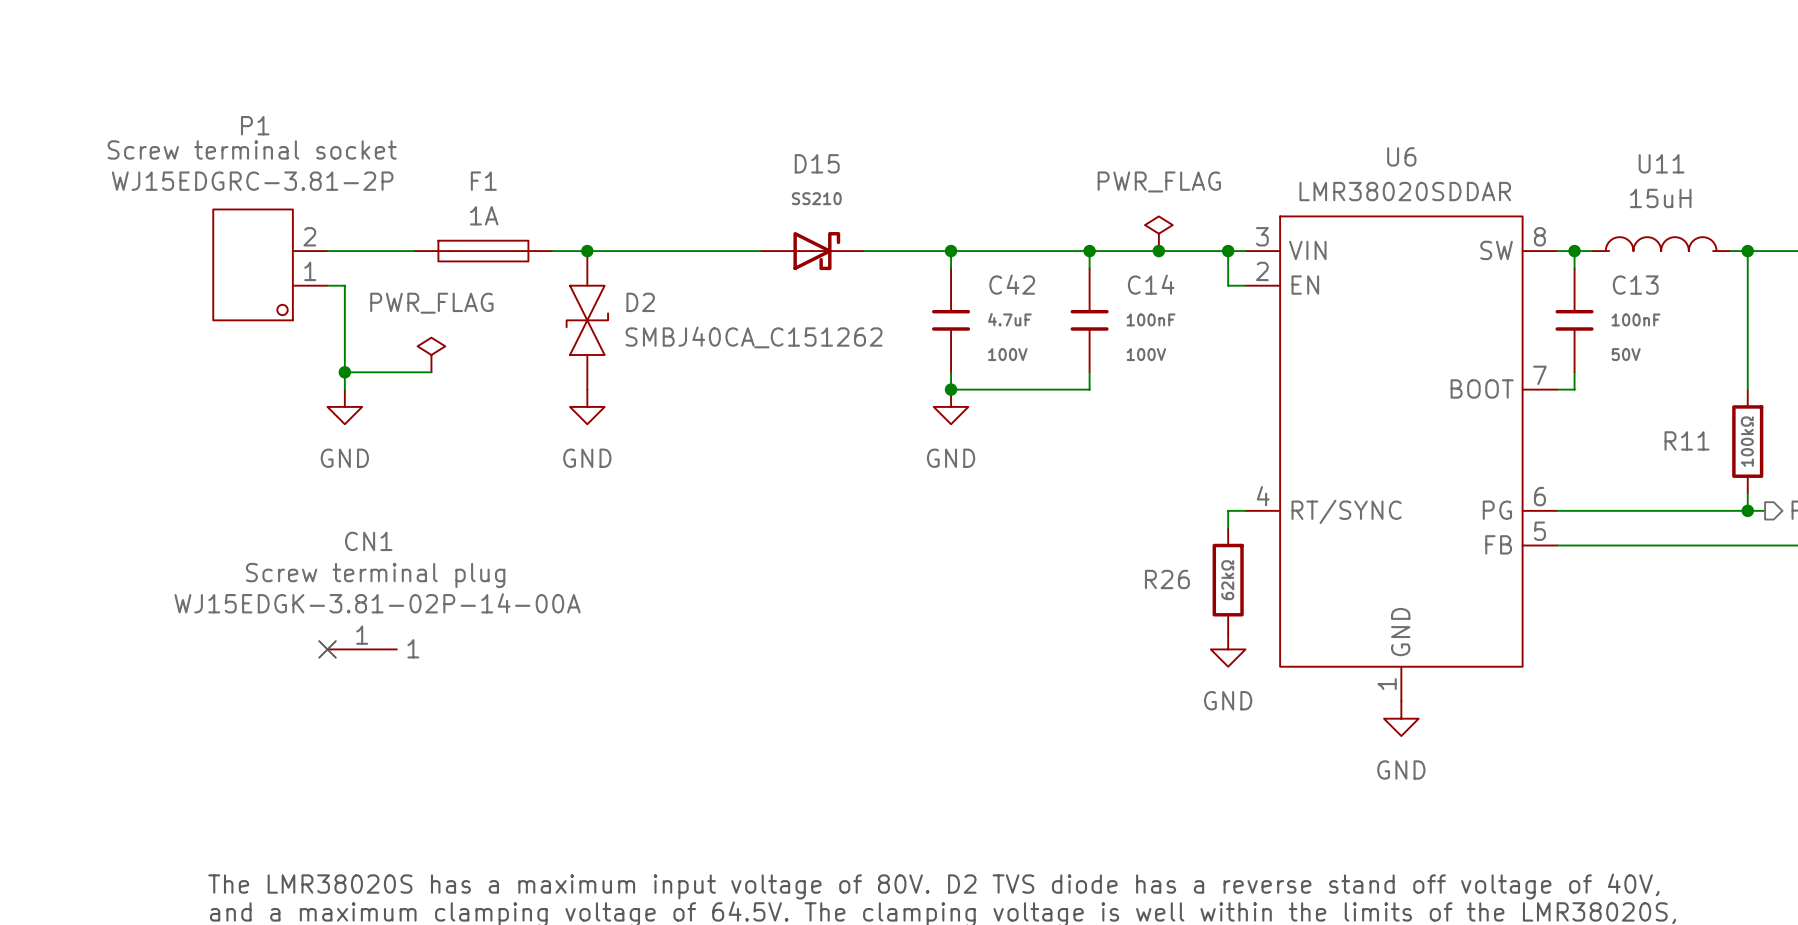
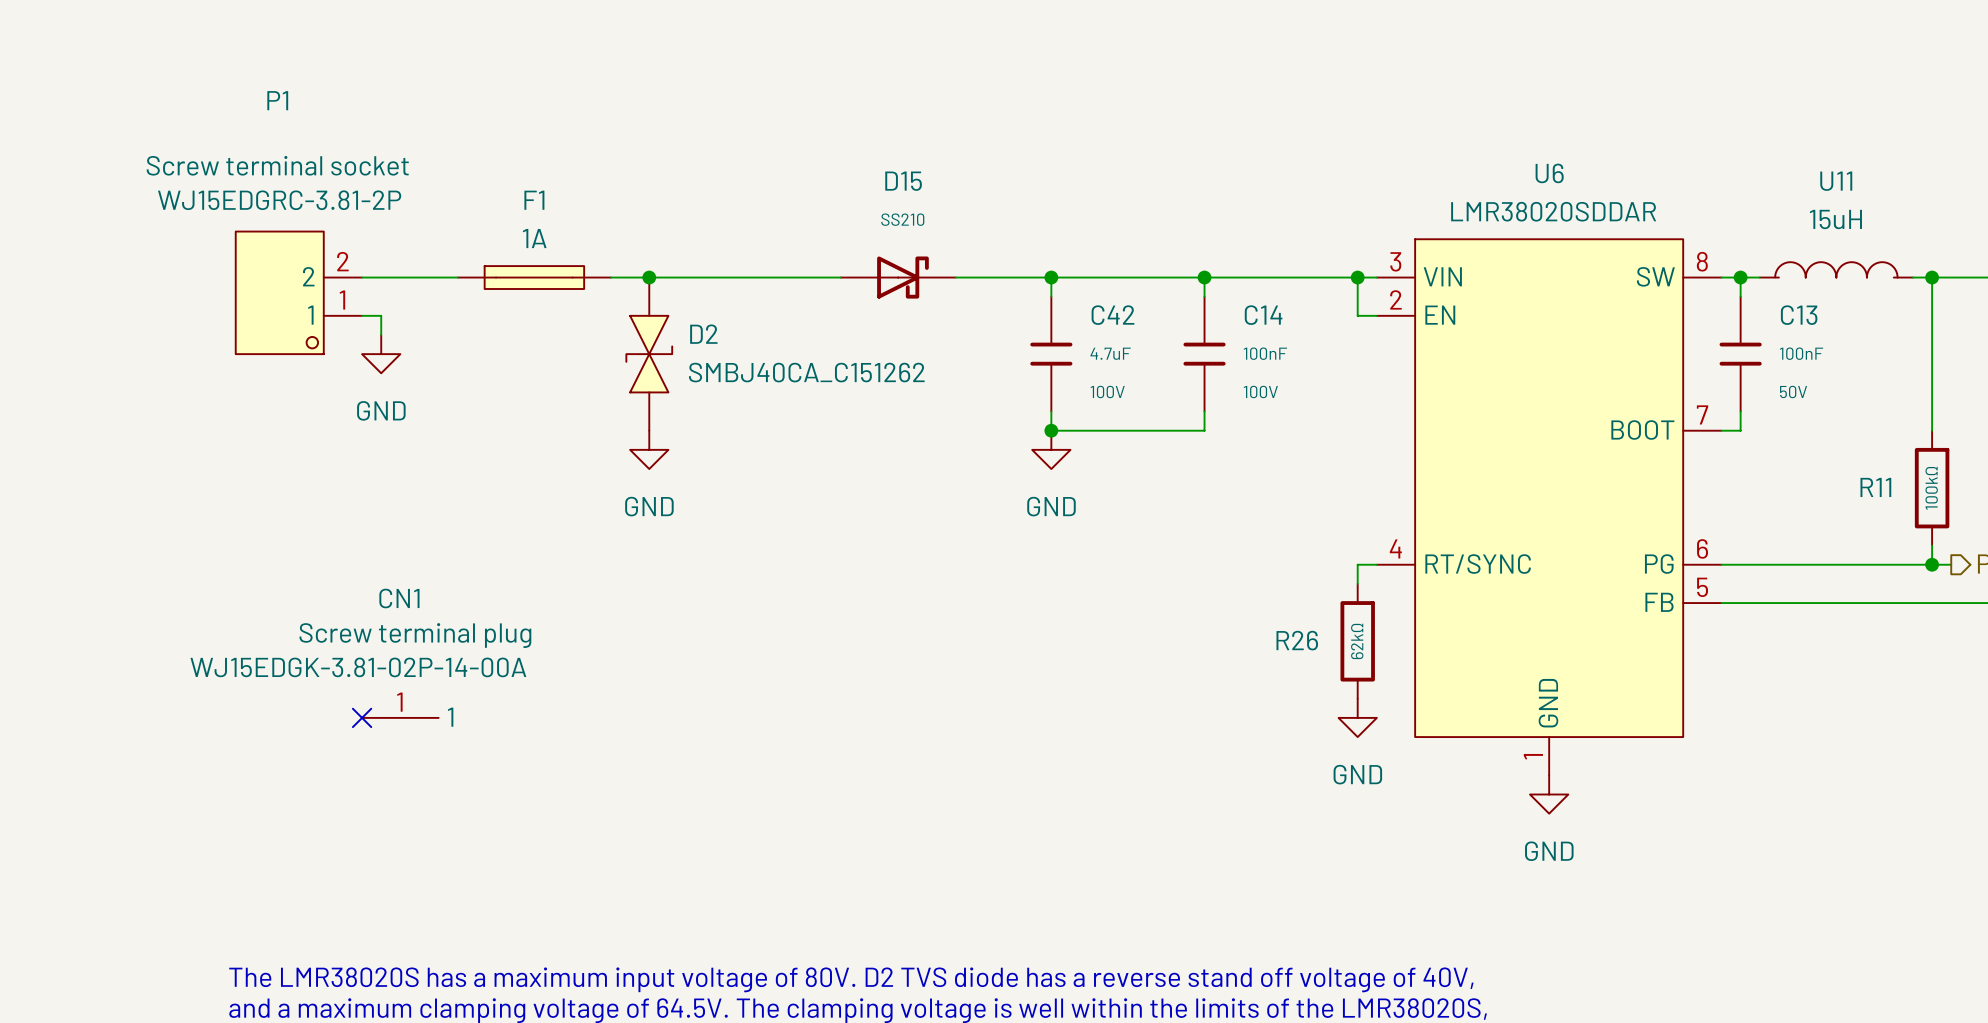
P1 name position: P1 (255, 125) -> P1 (277, 100)
power symbol: PWR_FLAG (1158, 233) -> none
P1 pin name: none -> 2 (308, 276)
junction: (1158, 251) -> none
P1 pin name: none -> 1 (310, 315)
wire: (344, 303) (344, 389) -> none
power symbol: PWR_FLAG (431, 354) -> none
wire: (344, 372) (431, 372) -> none
junction: (344, 372) -> none
power symbol position: GND (344, 406) -> GND (381, 354)

